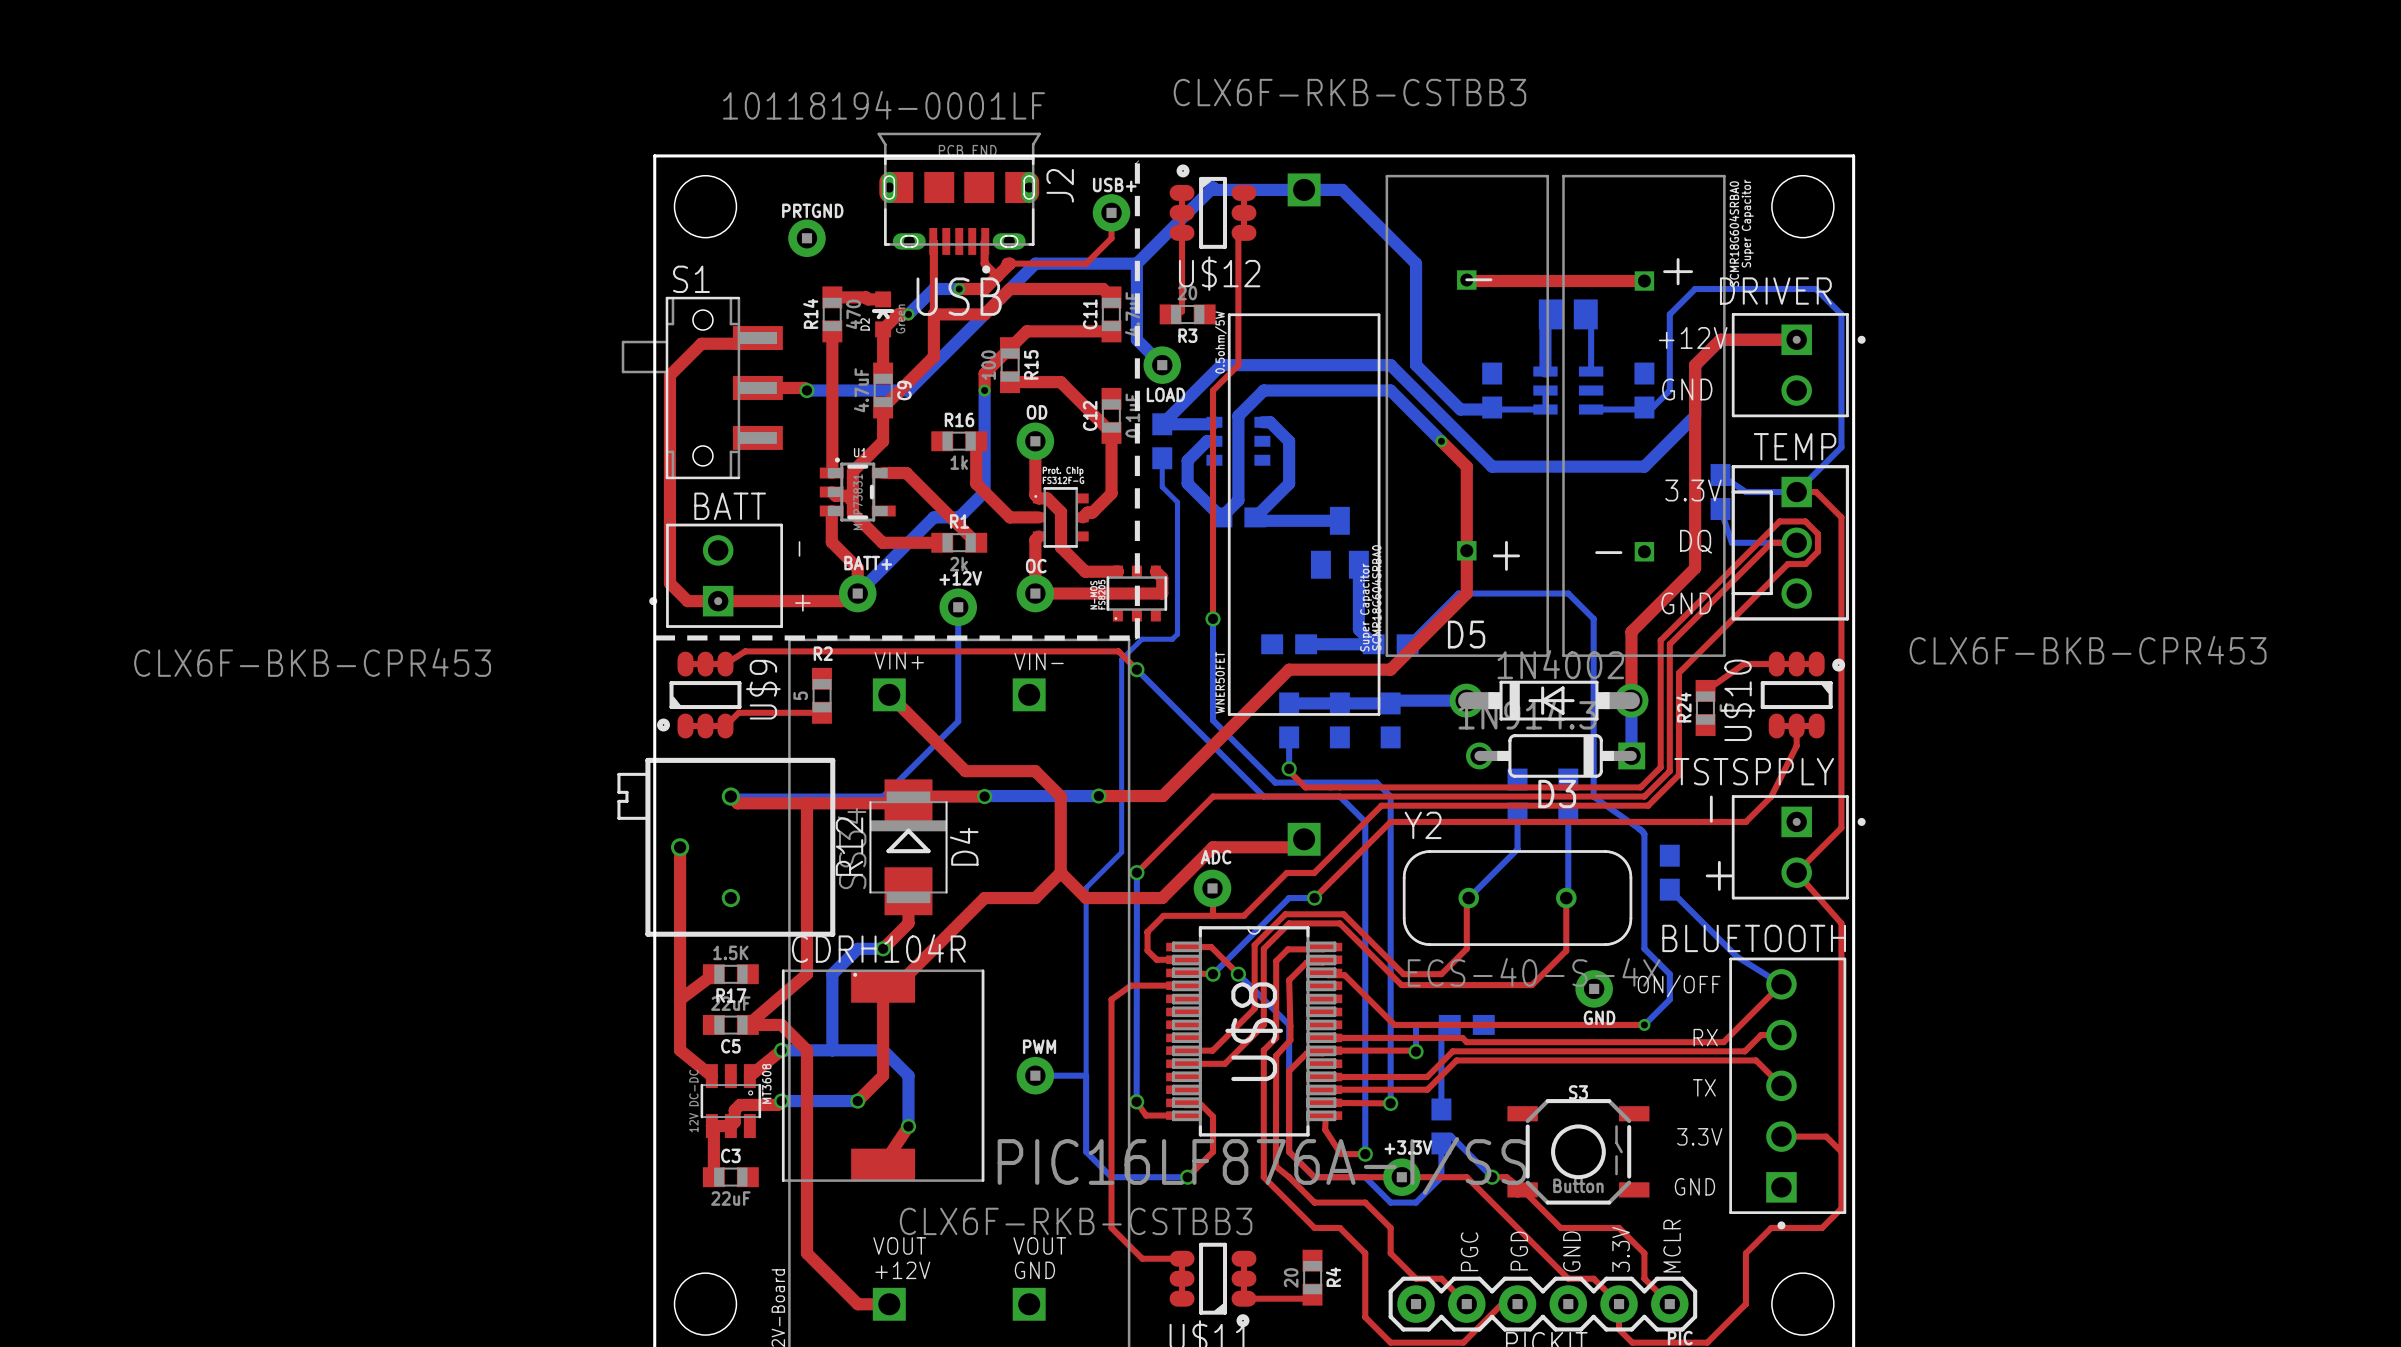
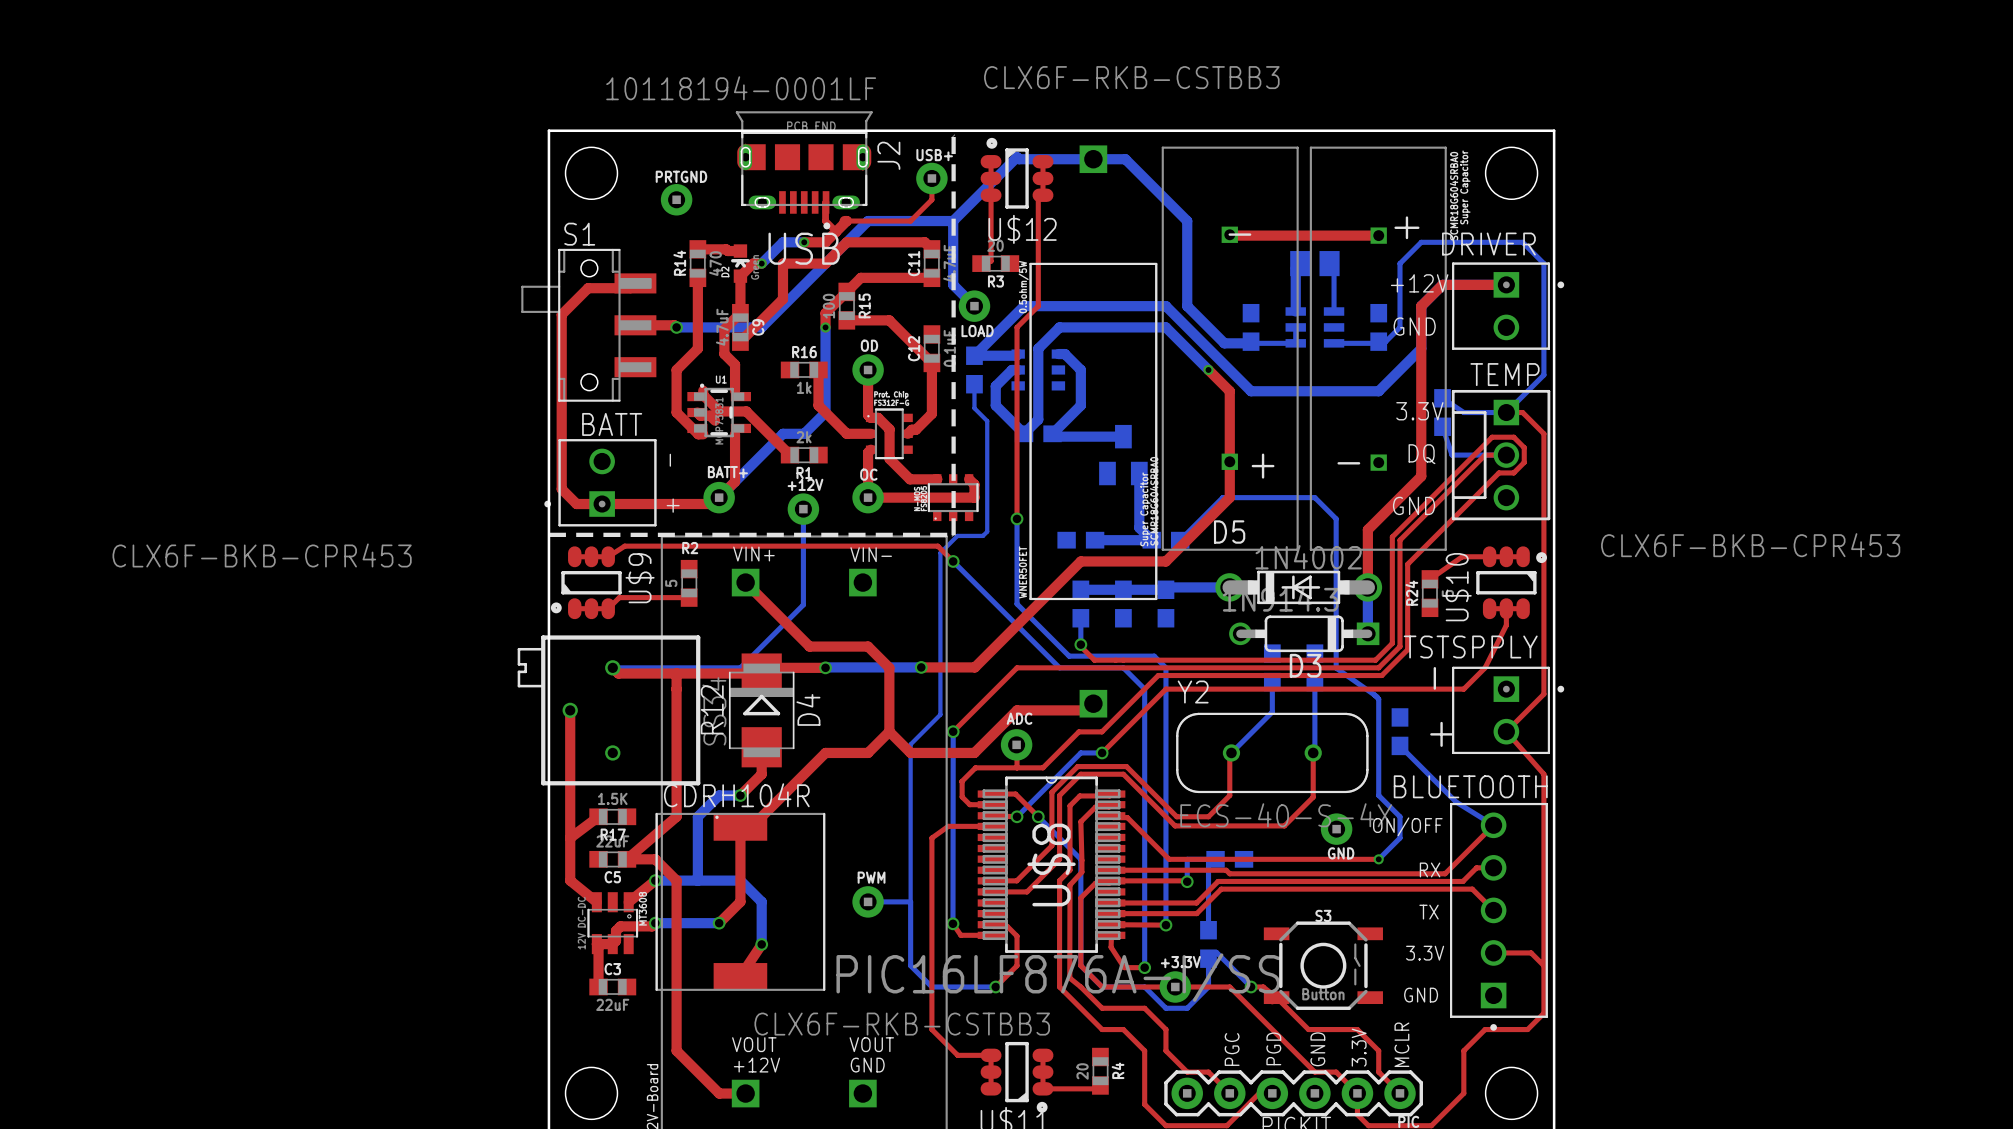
top track: (933, 241) (933, 314) -> none
top track: none -> (740, 313) (724, 329) (724, 354) (735, 364) (735, 390)
top track: (883, 407) (883, 441) (852, 471) (852, 513) (882, 542) (942, 542) -> (703, 390) (703, 395) (719, 411) (746, 411) (790, 455)
top track: (832, 415) (831, 473) -> (697, 348) (676, 369) (676, 412) (698, 434) (703, 434)
top track: (883, 473) (906, 473) (976, 542) -> none
top track: (831, 511) (831, 542) (857, 568) (857, 593) -> (735, 434) (735, 481) (719, 497)
R1 name position: R1 (959, 521) -> R1 (804, 472)
R1 value position: 2k (958, 564) -> 2k (804, 437)

